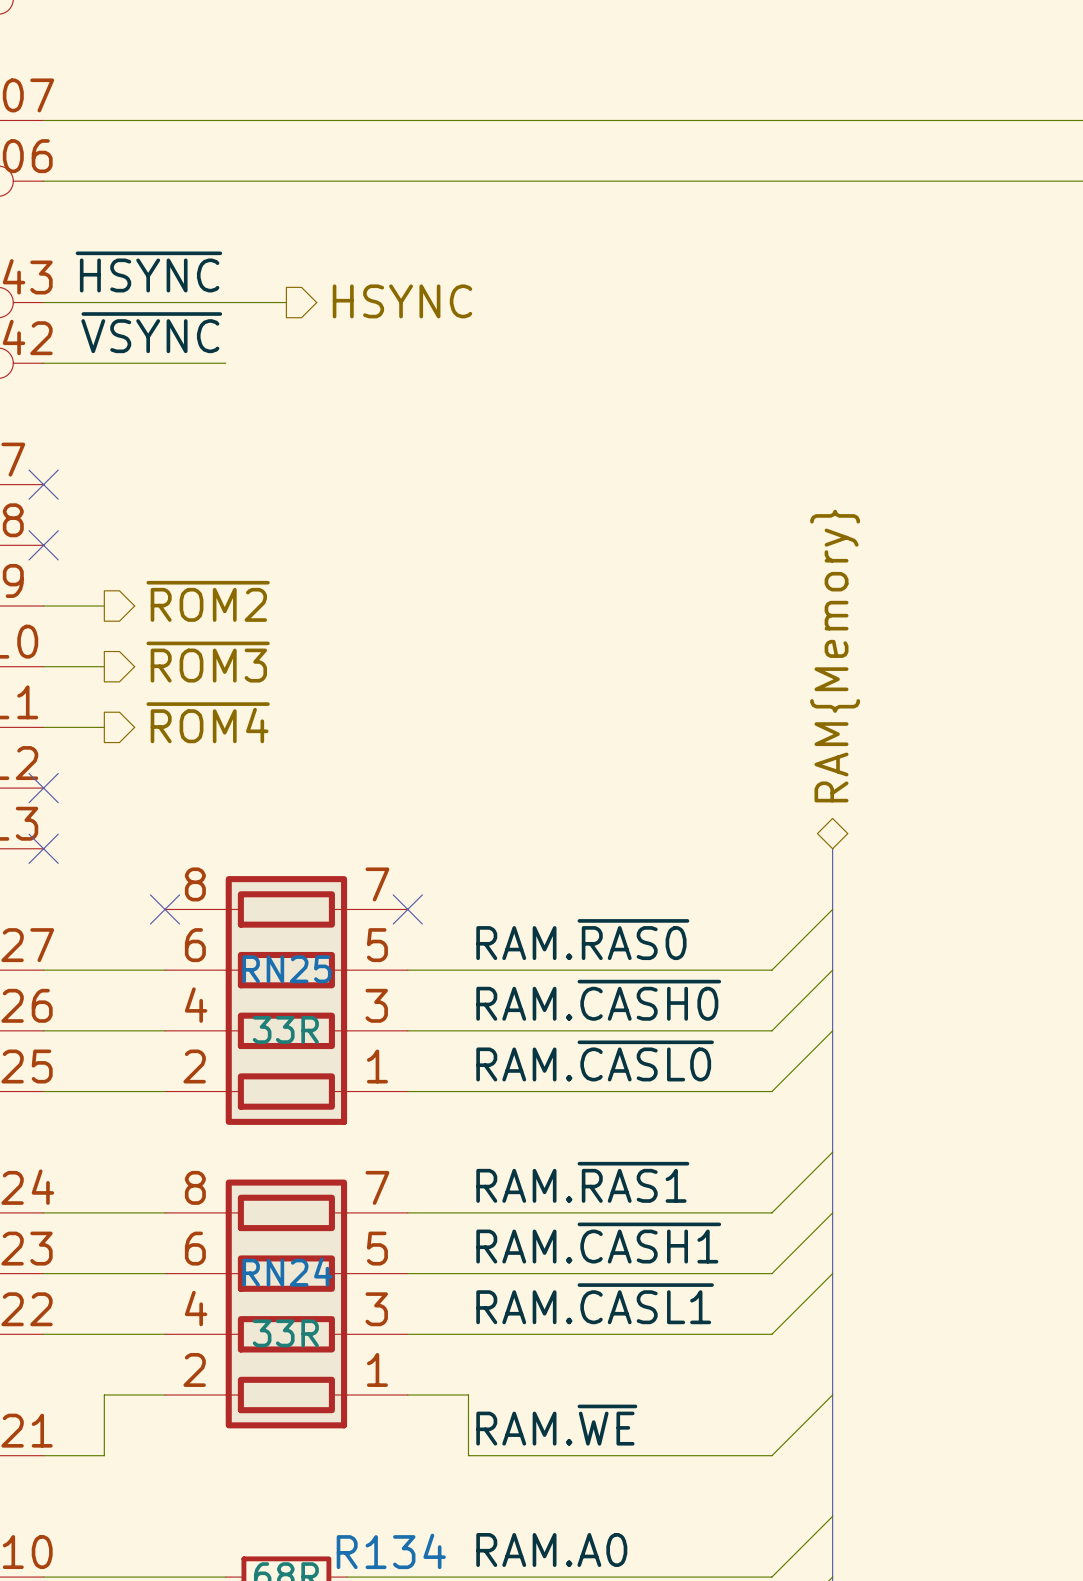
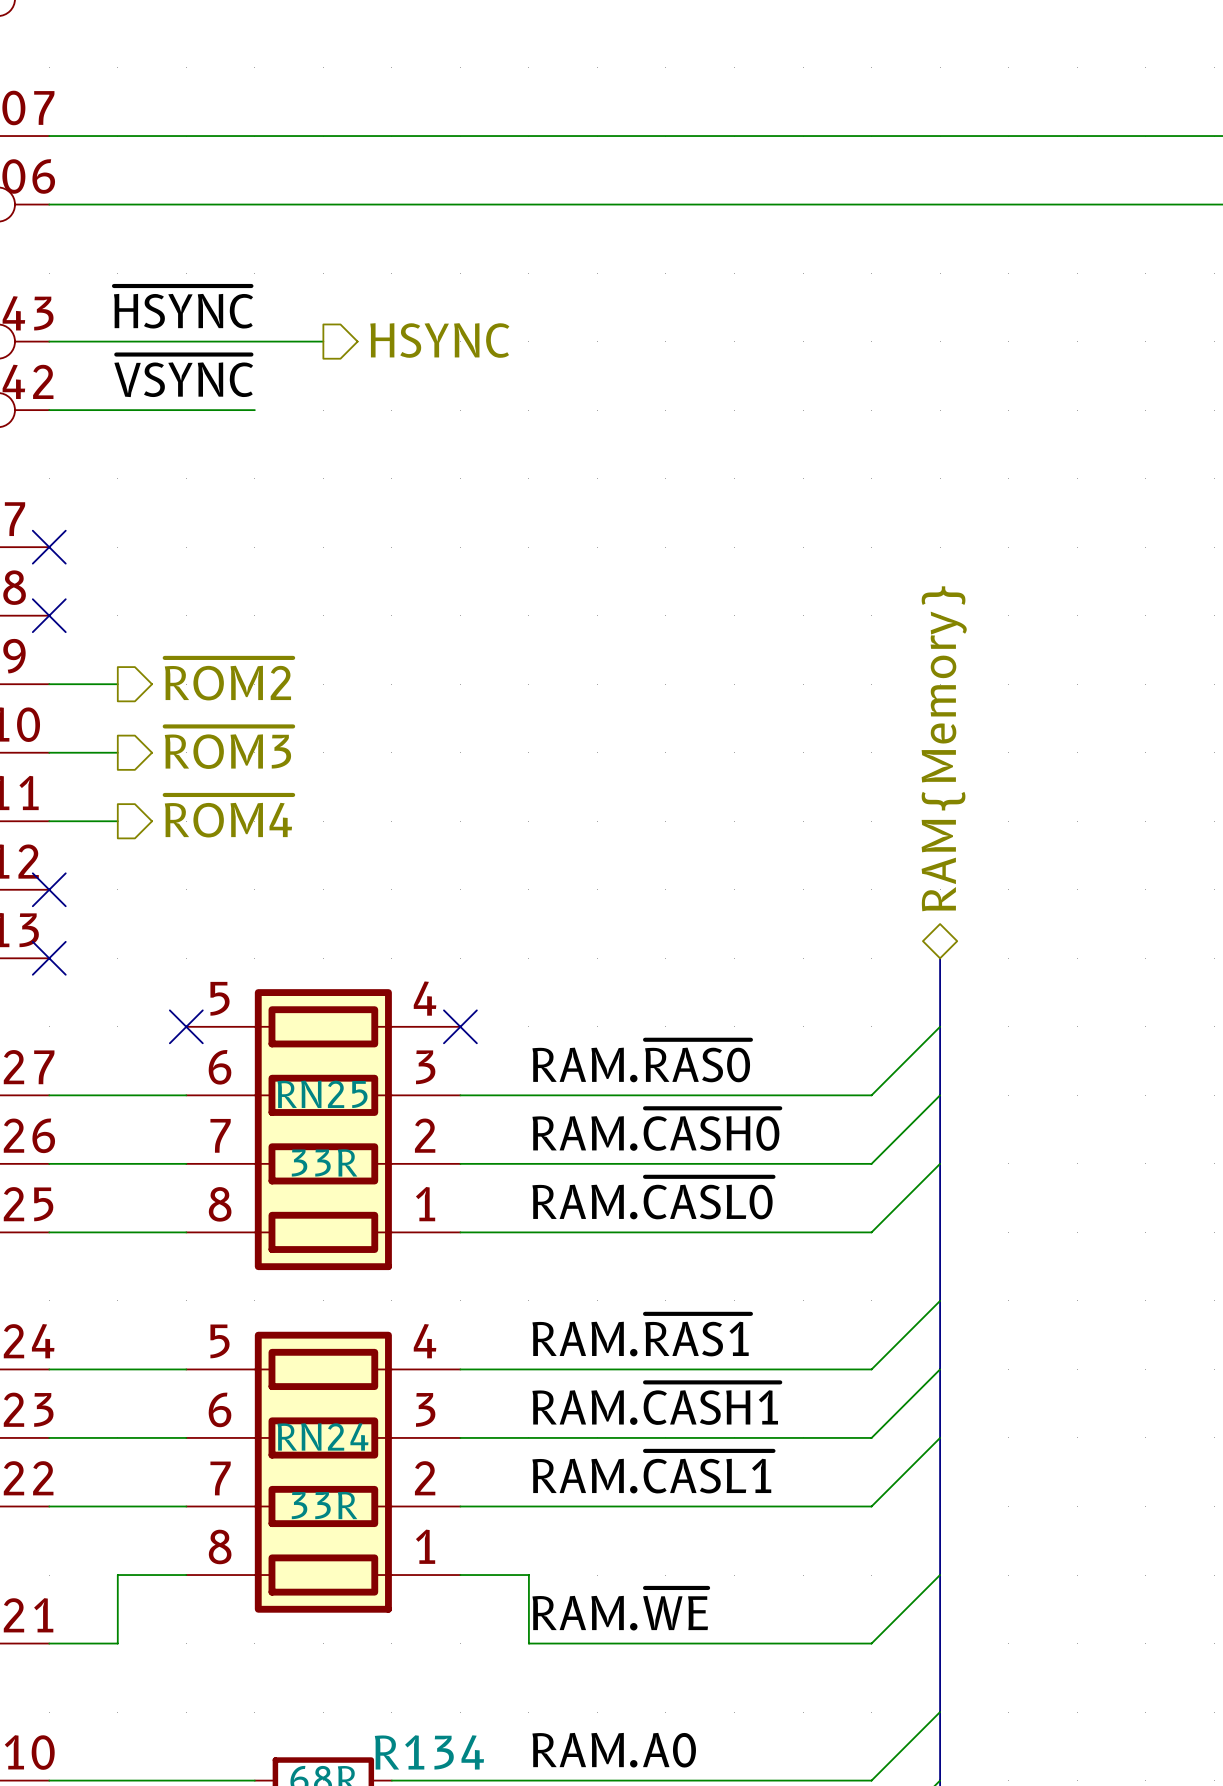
RN25 pin number: 8 (195, 884) -> 5 (220, 998)
RN25 pin number: 7 (377, 884) -> 4 (425, 998)
RN25 pin number: 5 (377, 945) -> 3 (425, 1067)
RN25 pin number: 4 (196, 1005) -> 7 (220, 1135)
RN25 pin number: 3 (376, 1005) -> 2 (425, 1135)
RN25 pin number: 2 (194, 1066) -> 8 (220, 1204)
RN24 pin number: 8 (195, 1187) -> 5 (220, 1341)
RN24 pin number: 7 (377, 1187) -> 4 (425, 1341)
RN24 pin number: 5 (377, 1248) -> 3 (425, 1409)
RN24 pin number: 4 (196, 1308) -> 7 (220, 1478)
RN24 pin number: 3 (376, 1309) -> 2 (425, 1478)
RN24 pin number: 2 (194, 1369) -> 8 (220, 1546)

